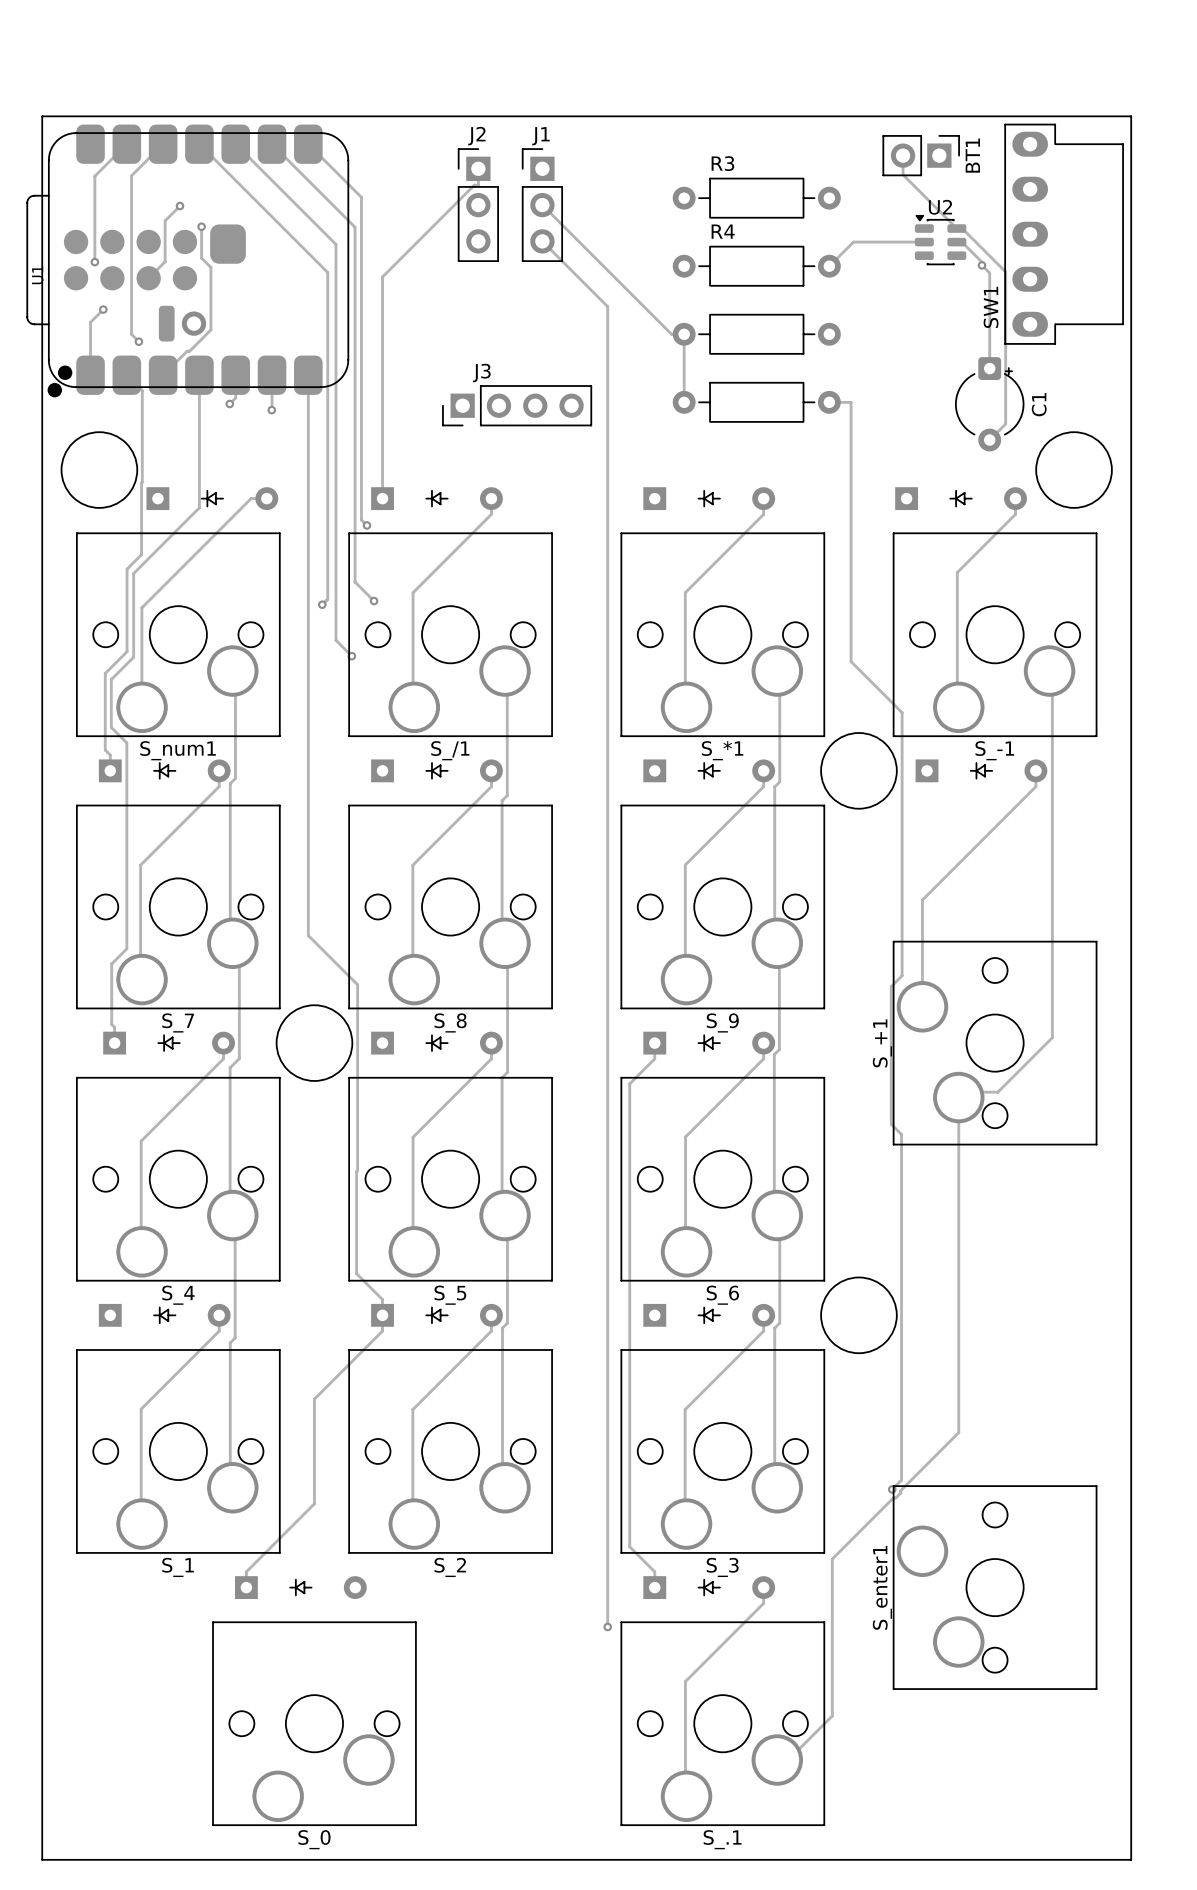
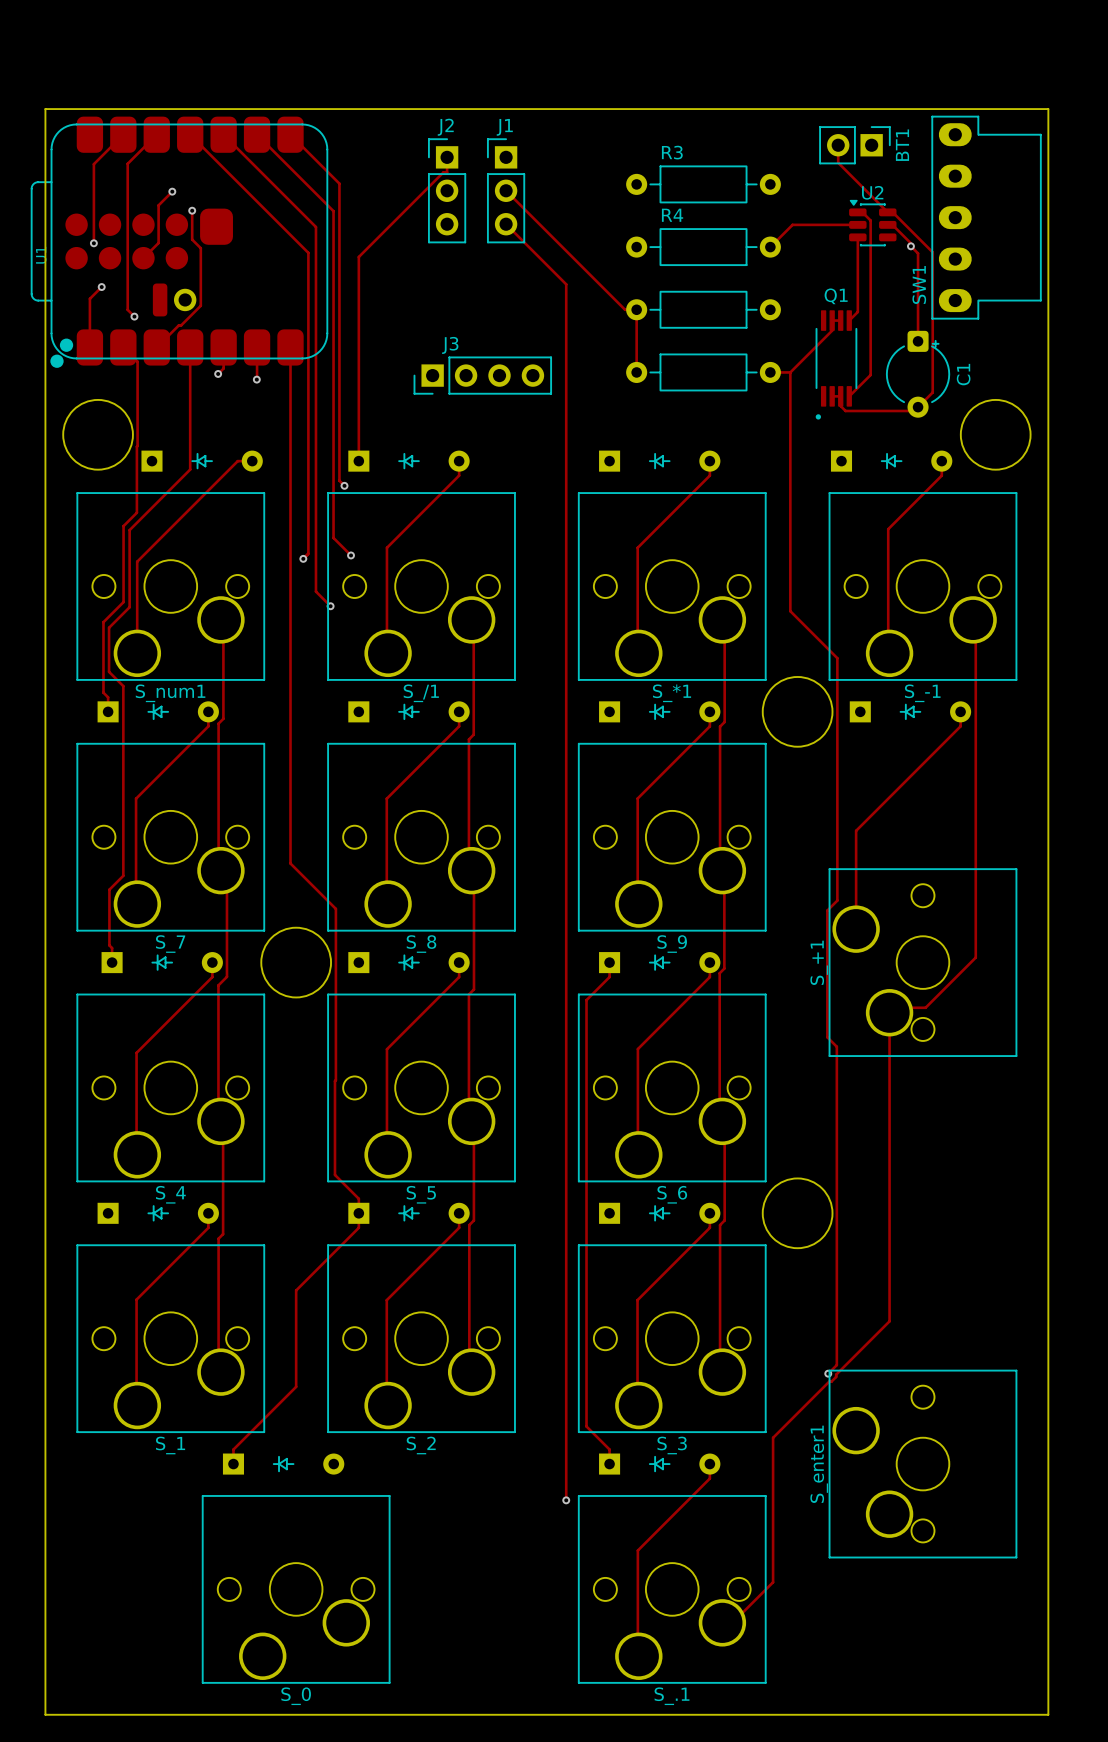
track: none -> (862, 212) (870, 220) (870, 375) (849, 396)
track: none -> (857, 237) (857, 312) (849, 320)
track: none -> (840, 320) (832, 320) (832, 330) (790, 372)
Q1: none -> (836, 364)
track: none -> (832, 396) (840, 396) (840, 406) (845, 410) (914, 410)

